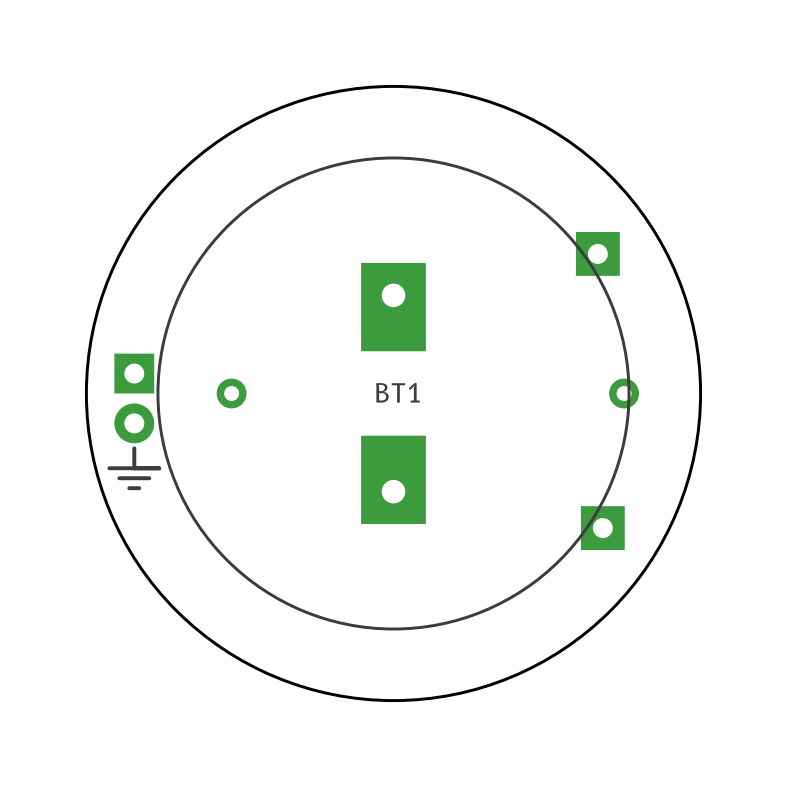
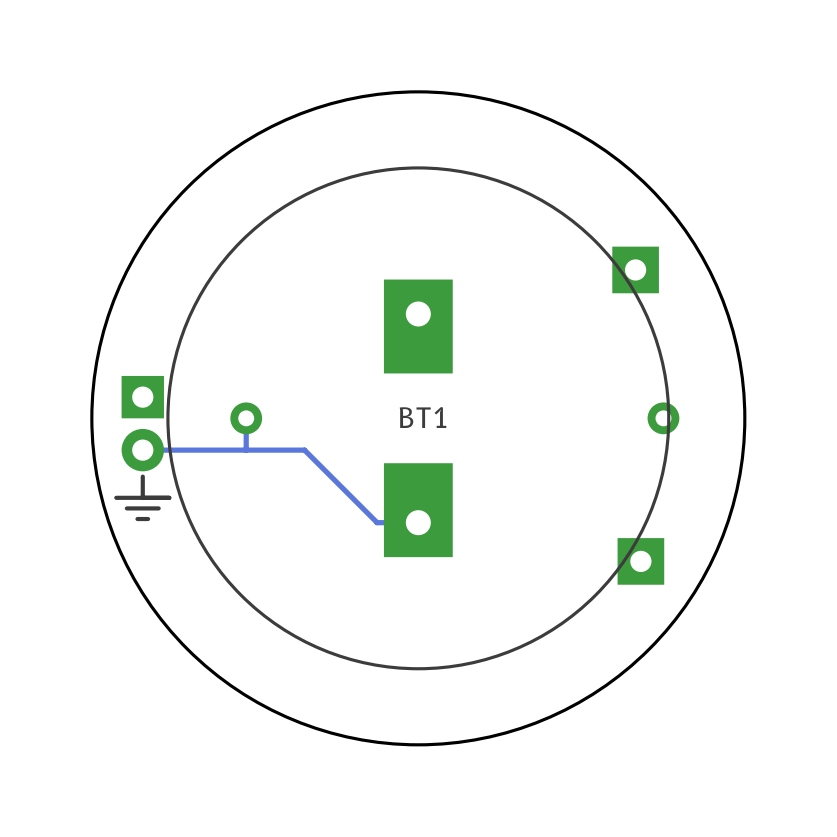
track: none -> (246, 418) (246, 450)
track: none -> (142, 450) (304, 450) (377, 522) (418, 522)

